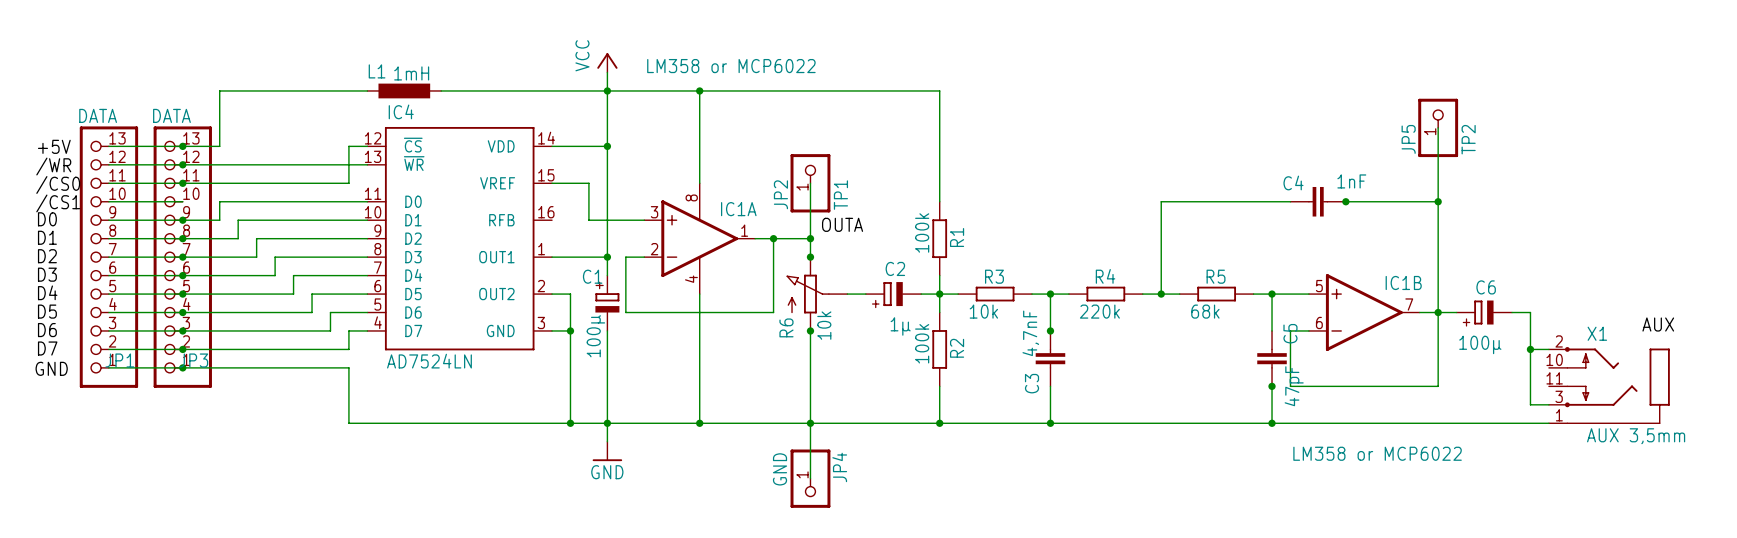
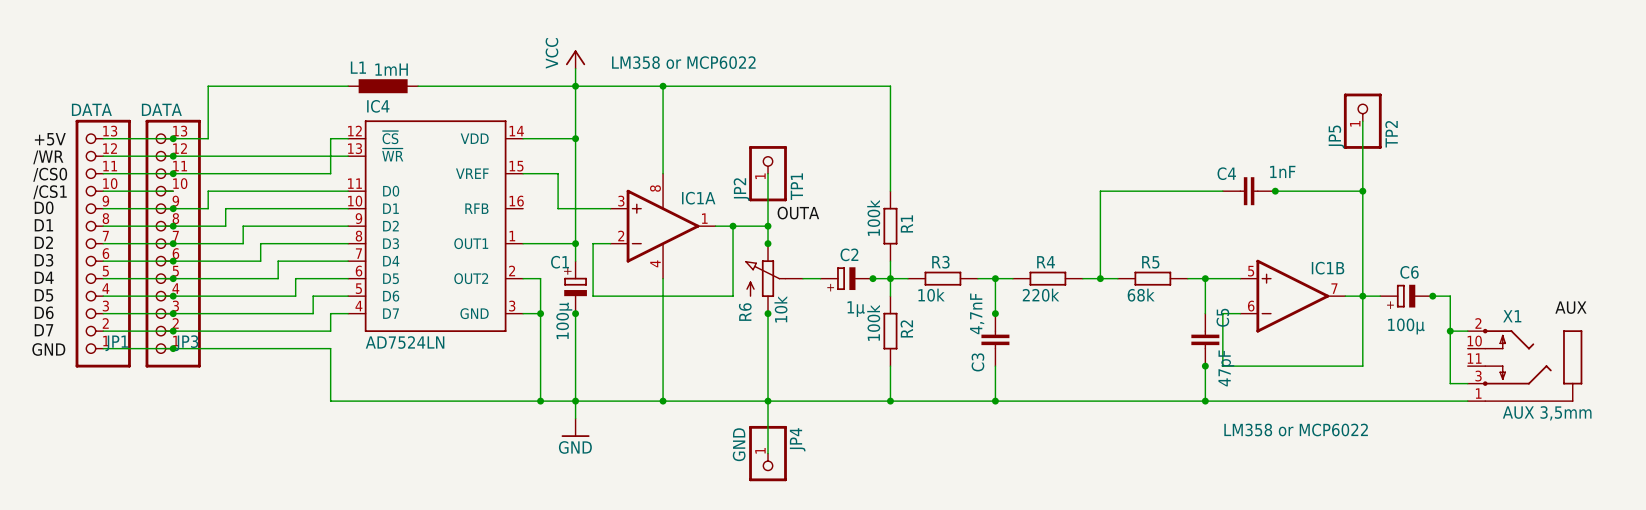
junction: none -> (872, 278)
junction: none -> (1432, 296)
junction: none -> (575, 313)

